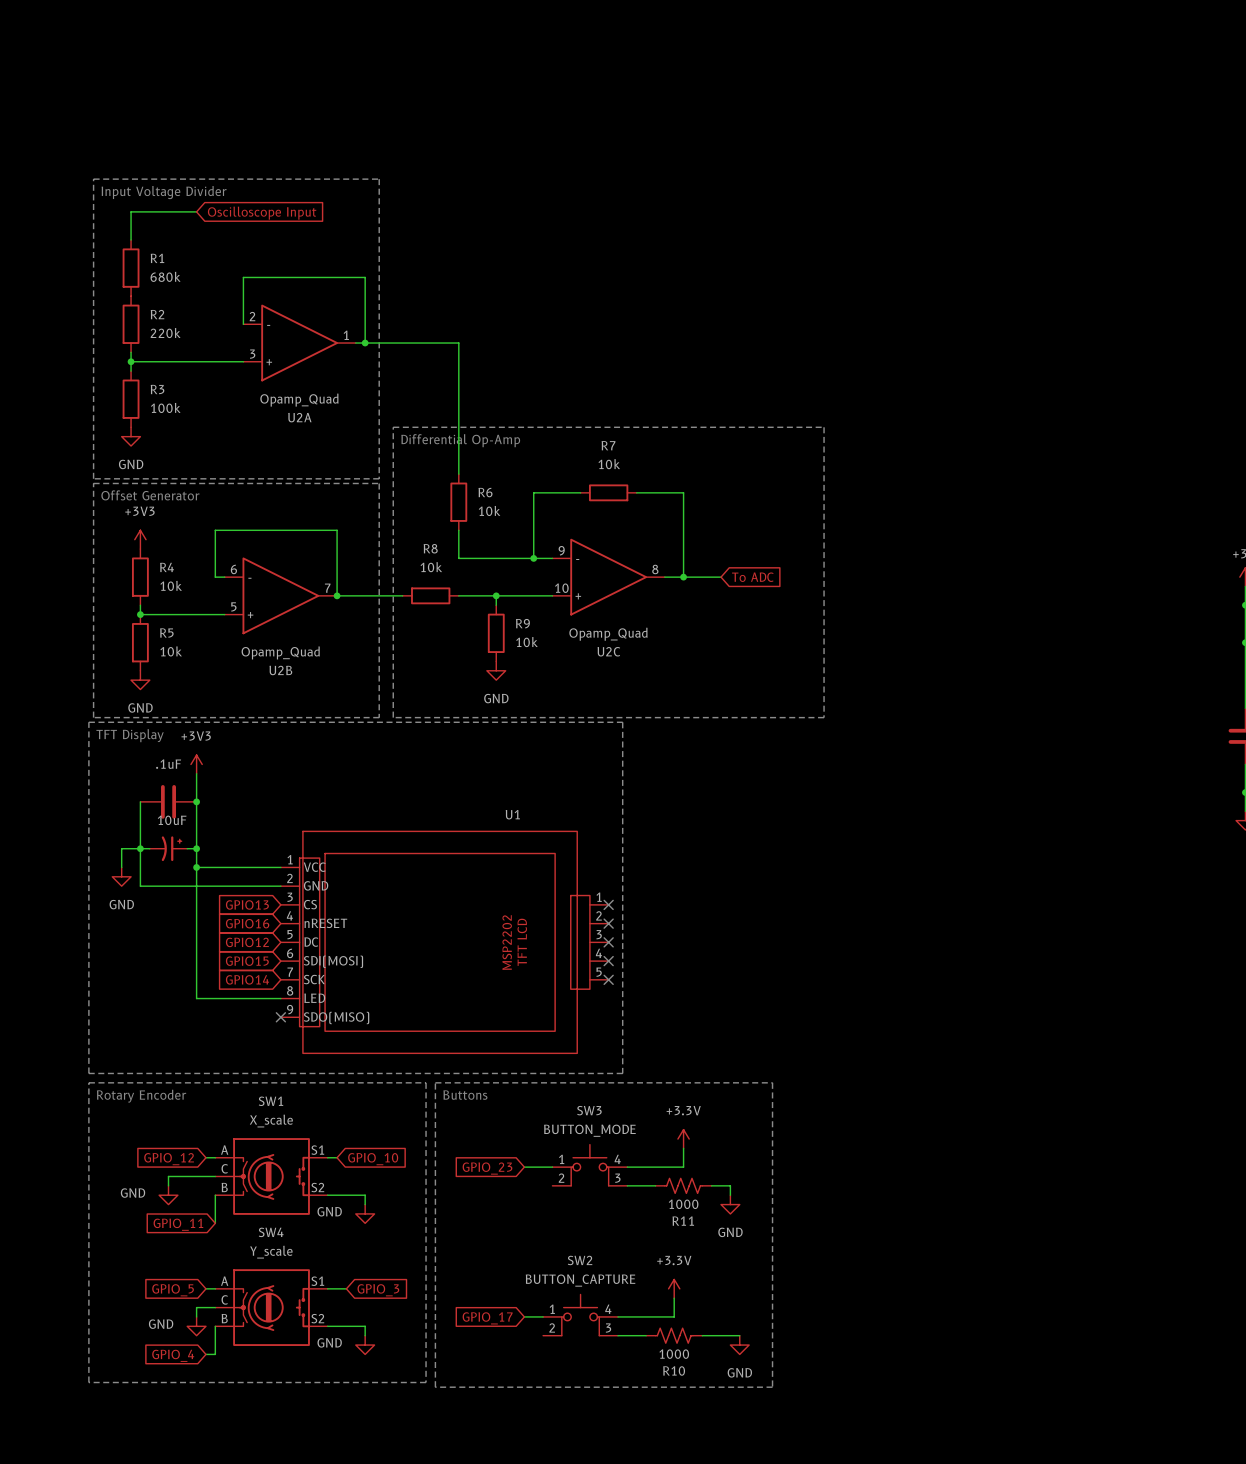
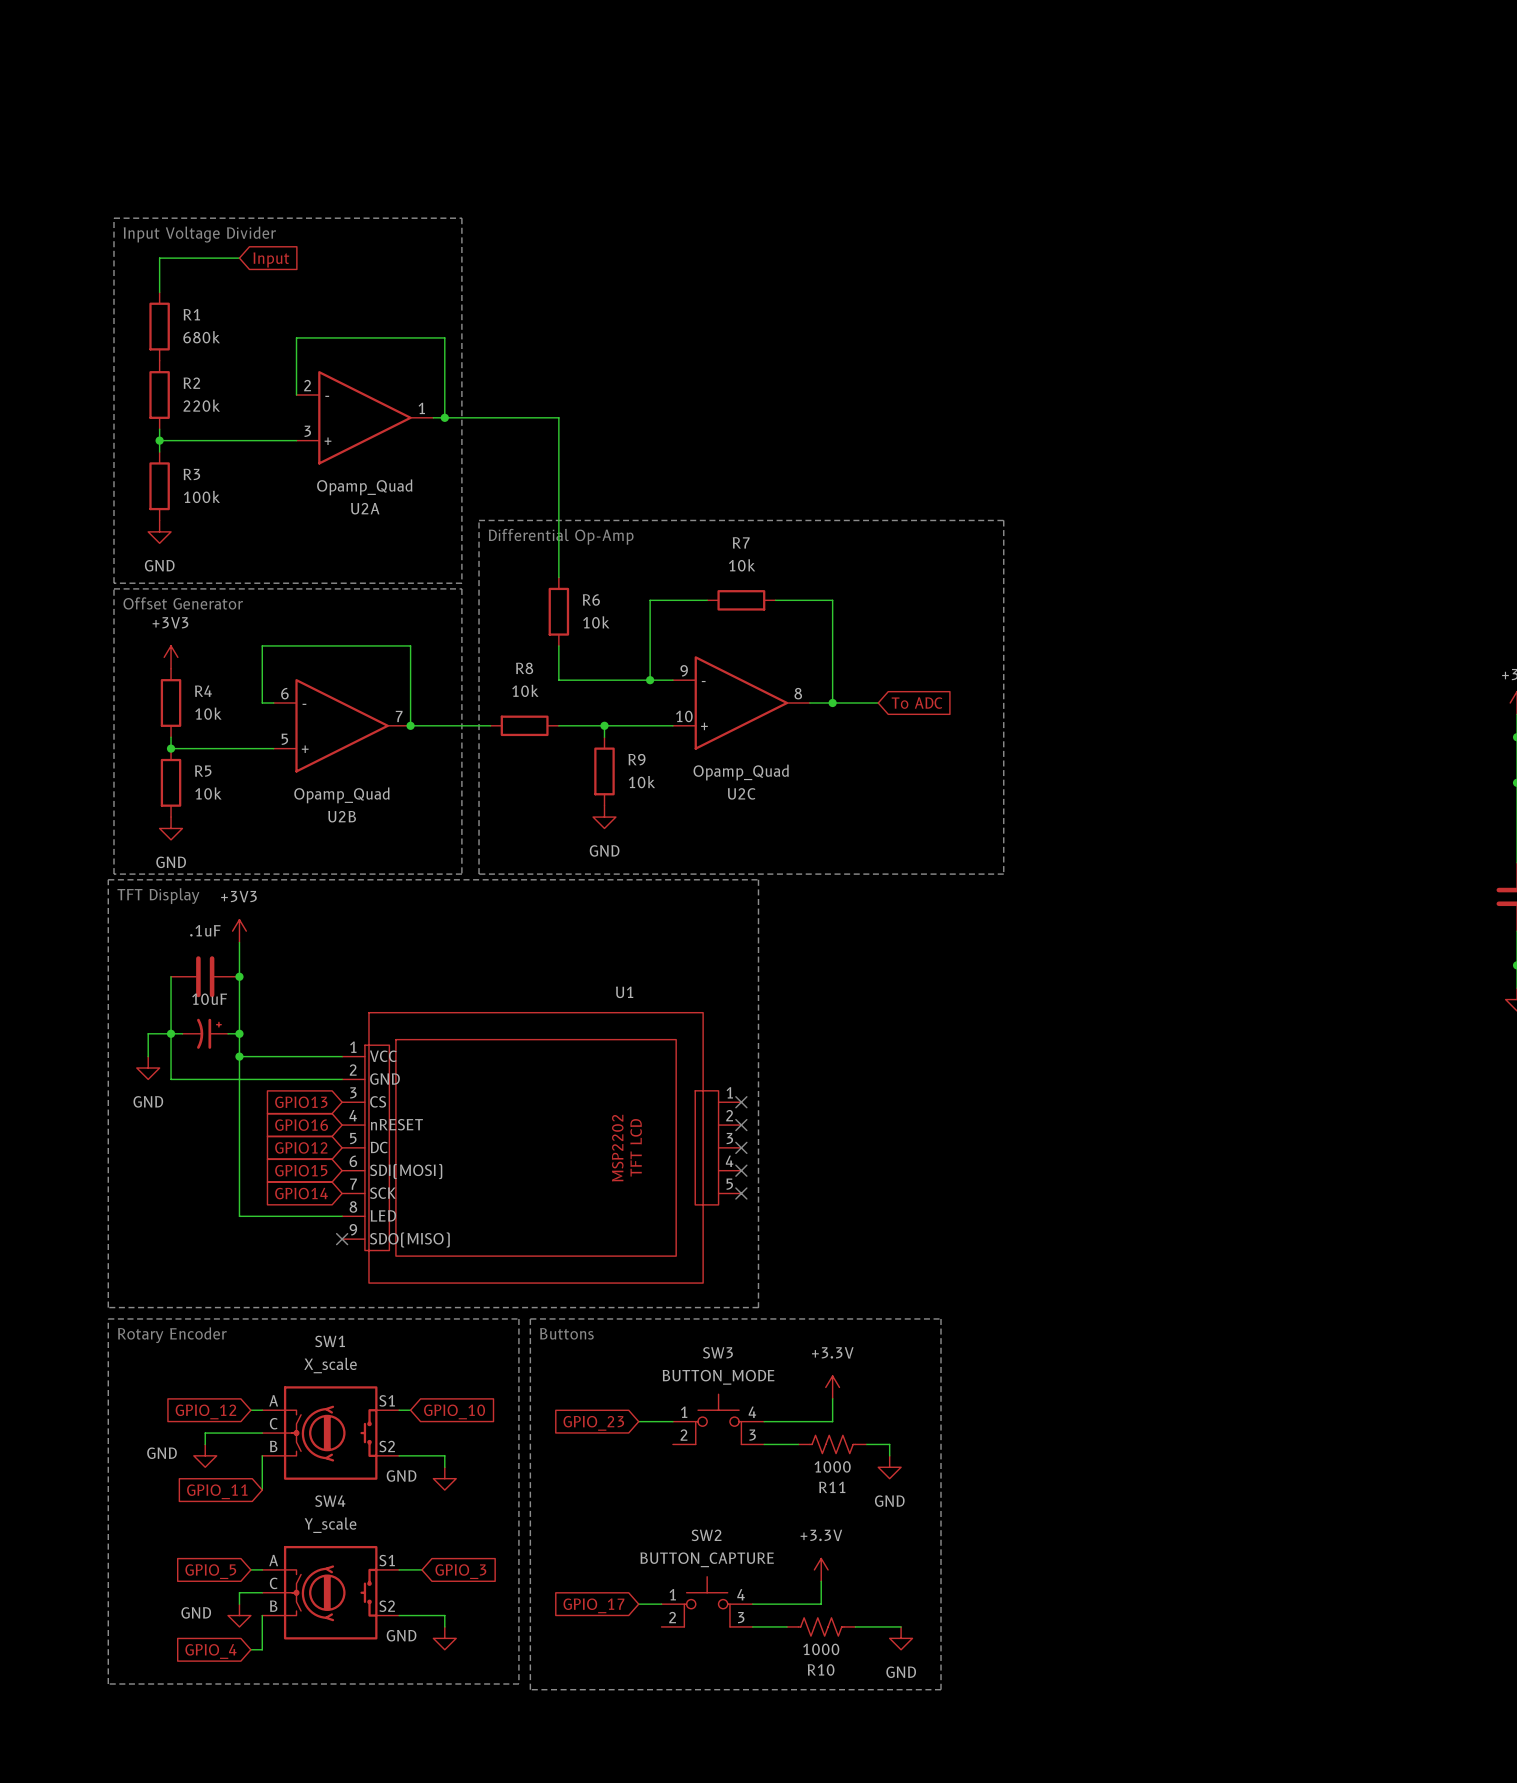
global label: Oscilloscope Input (262, 213) -> Input (271, 259)

